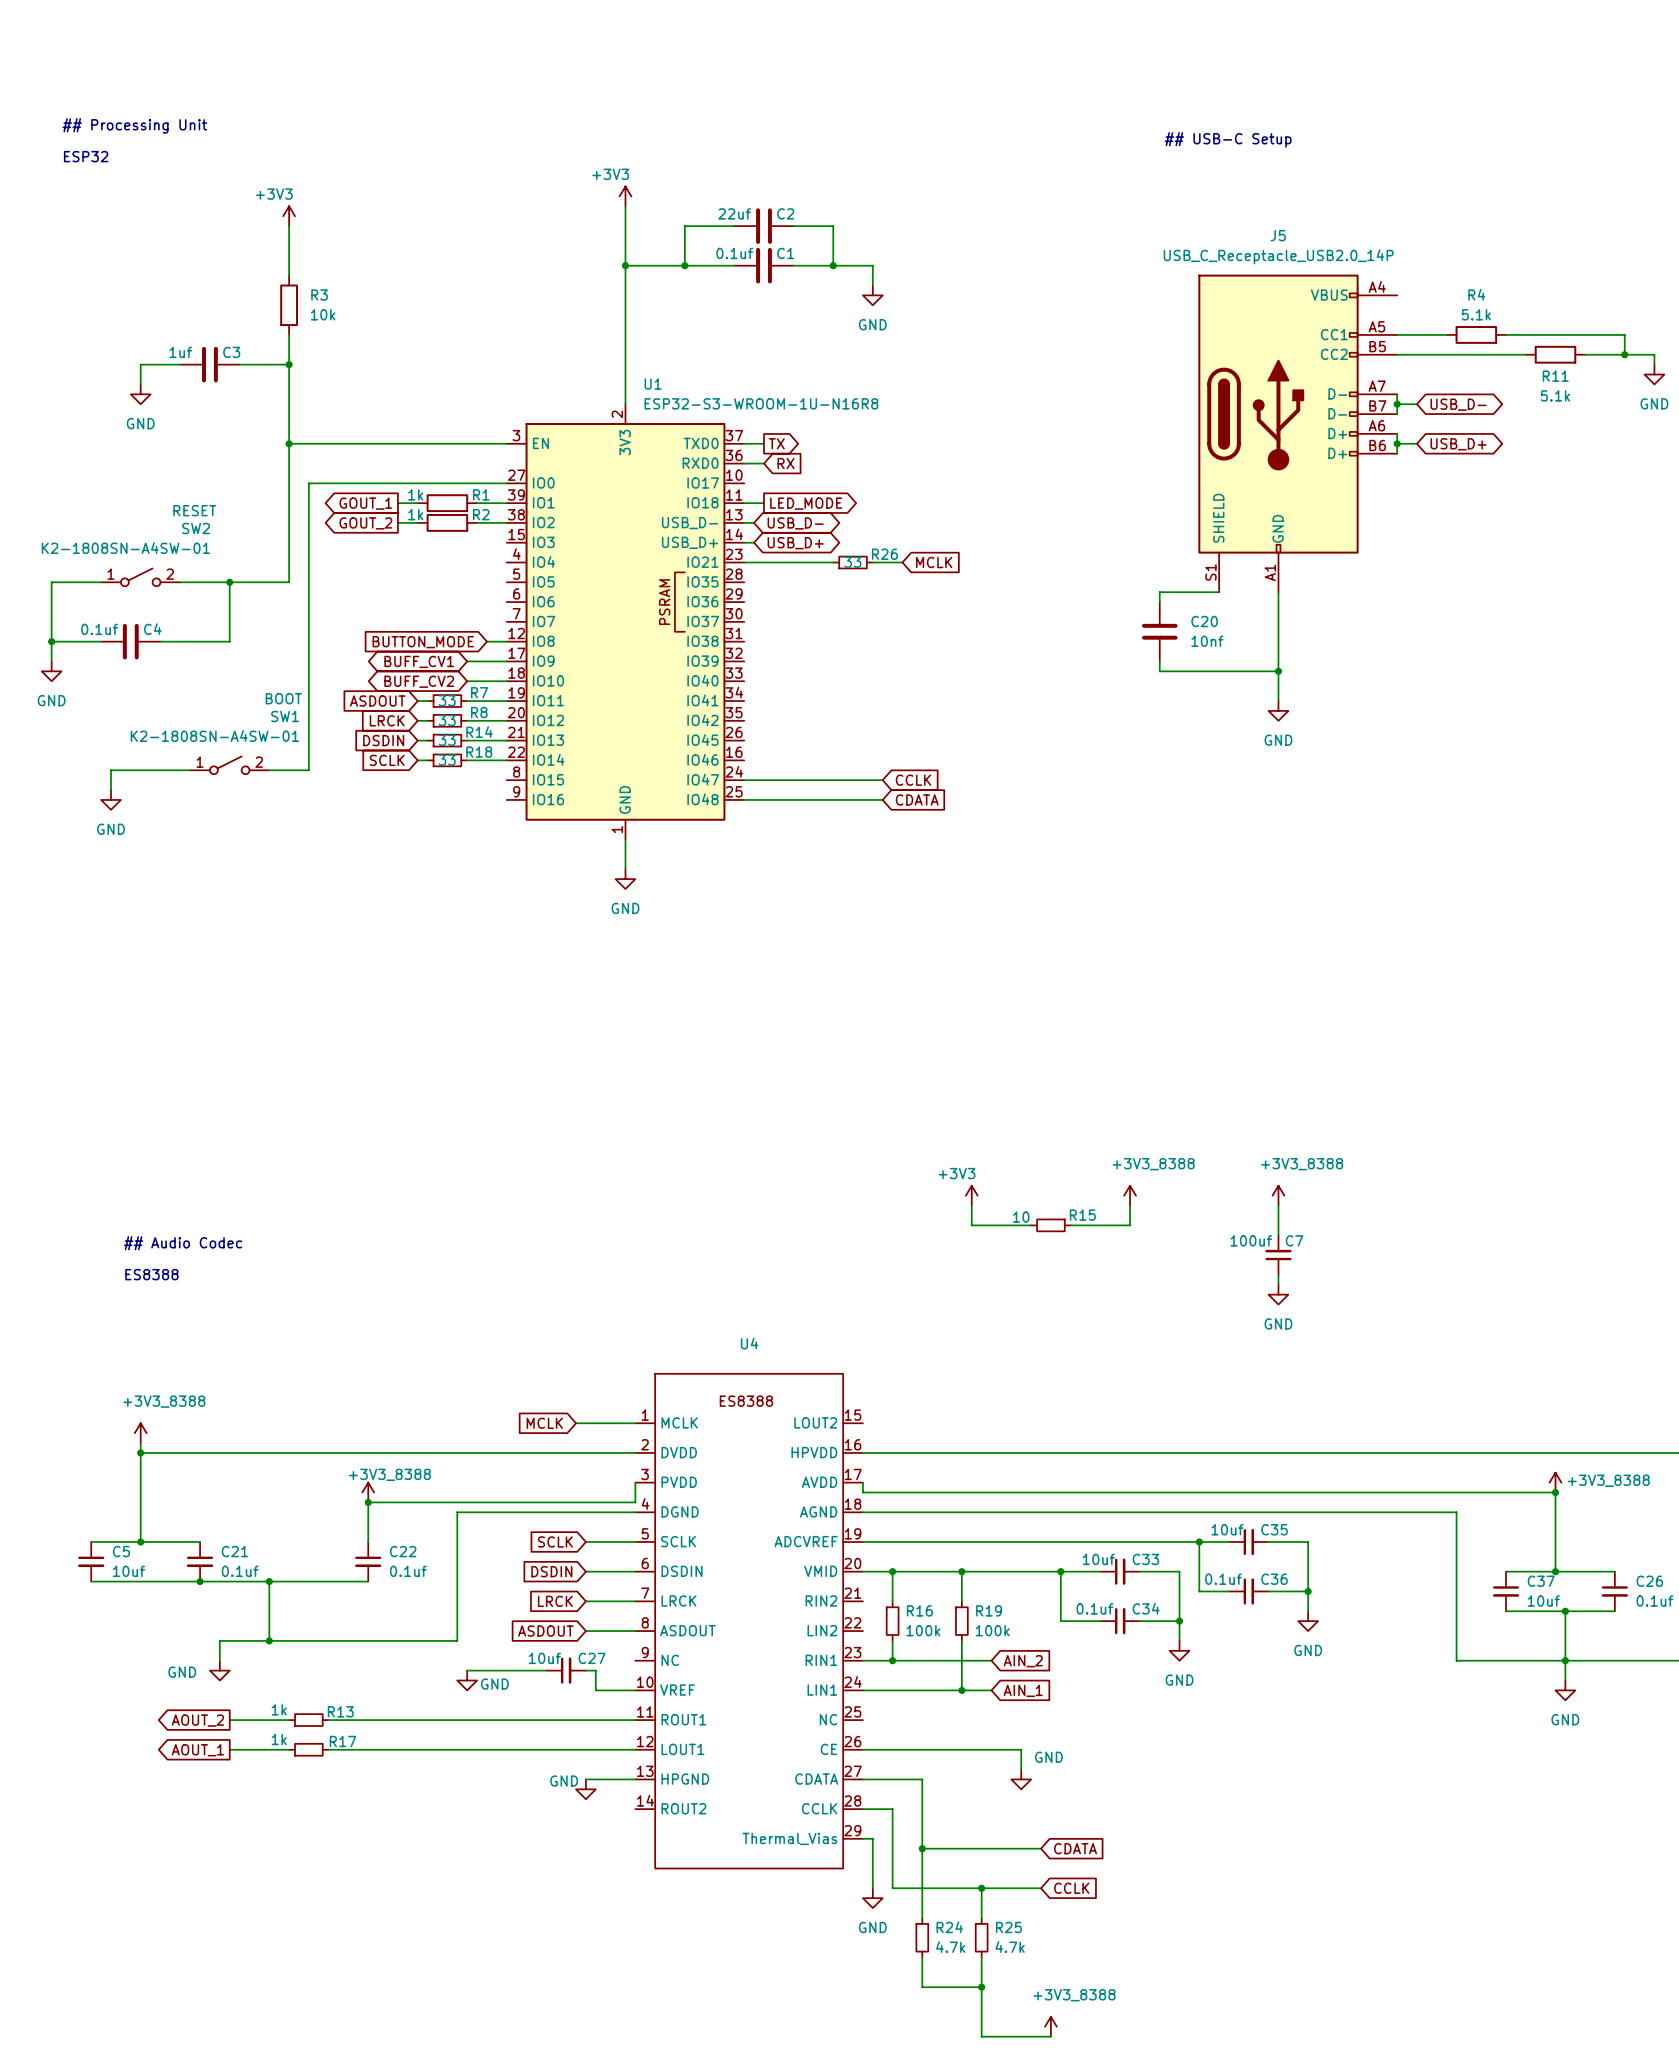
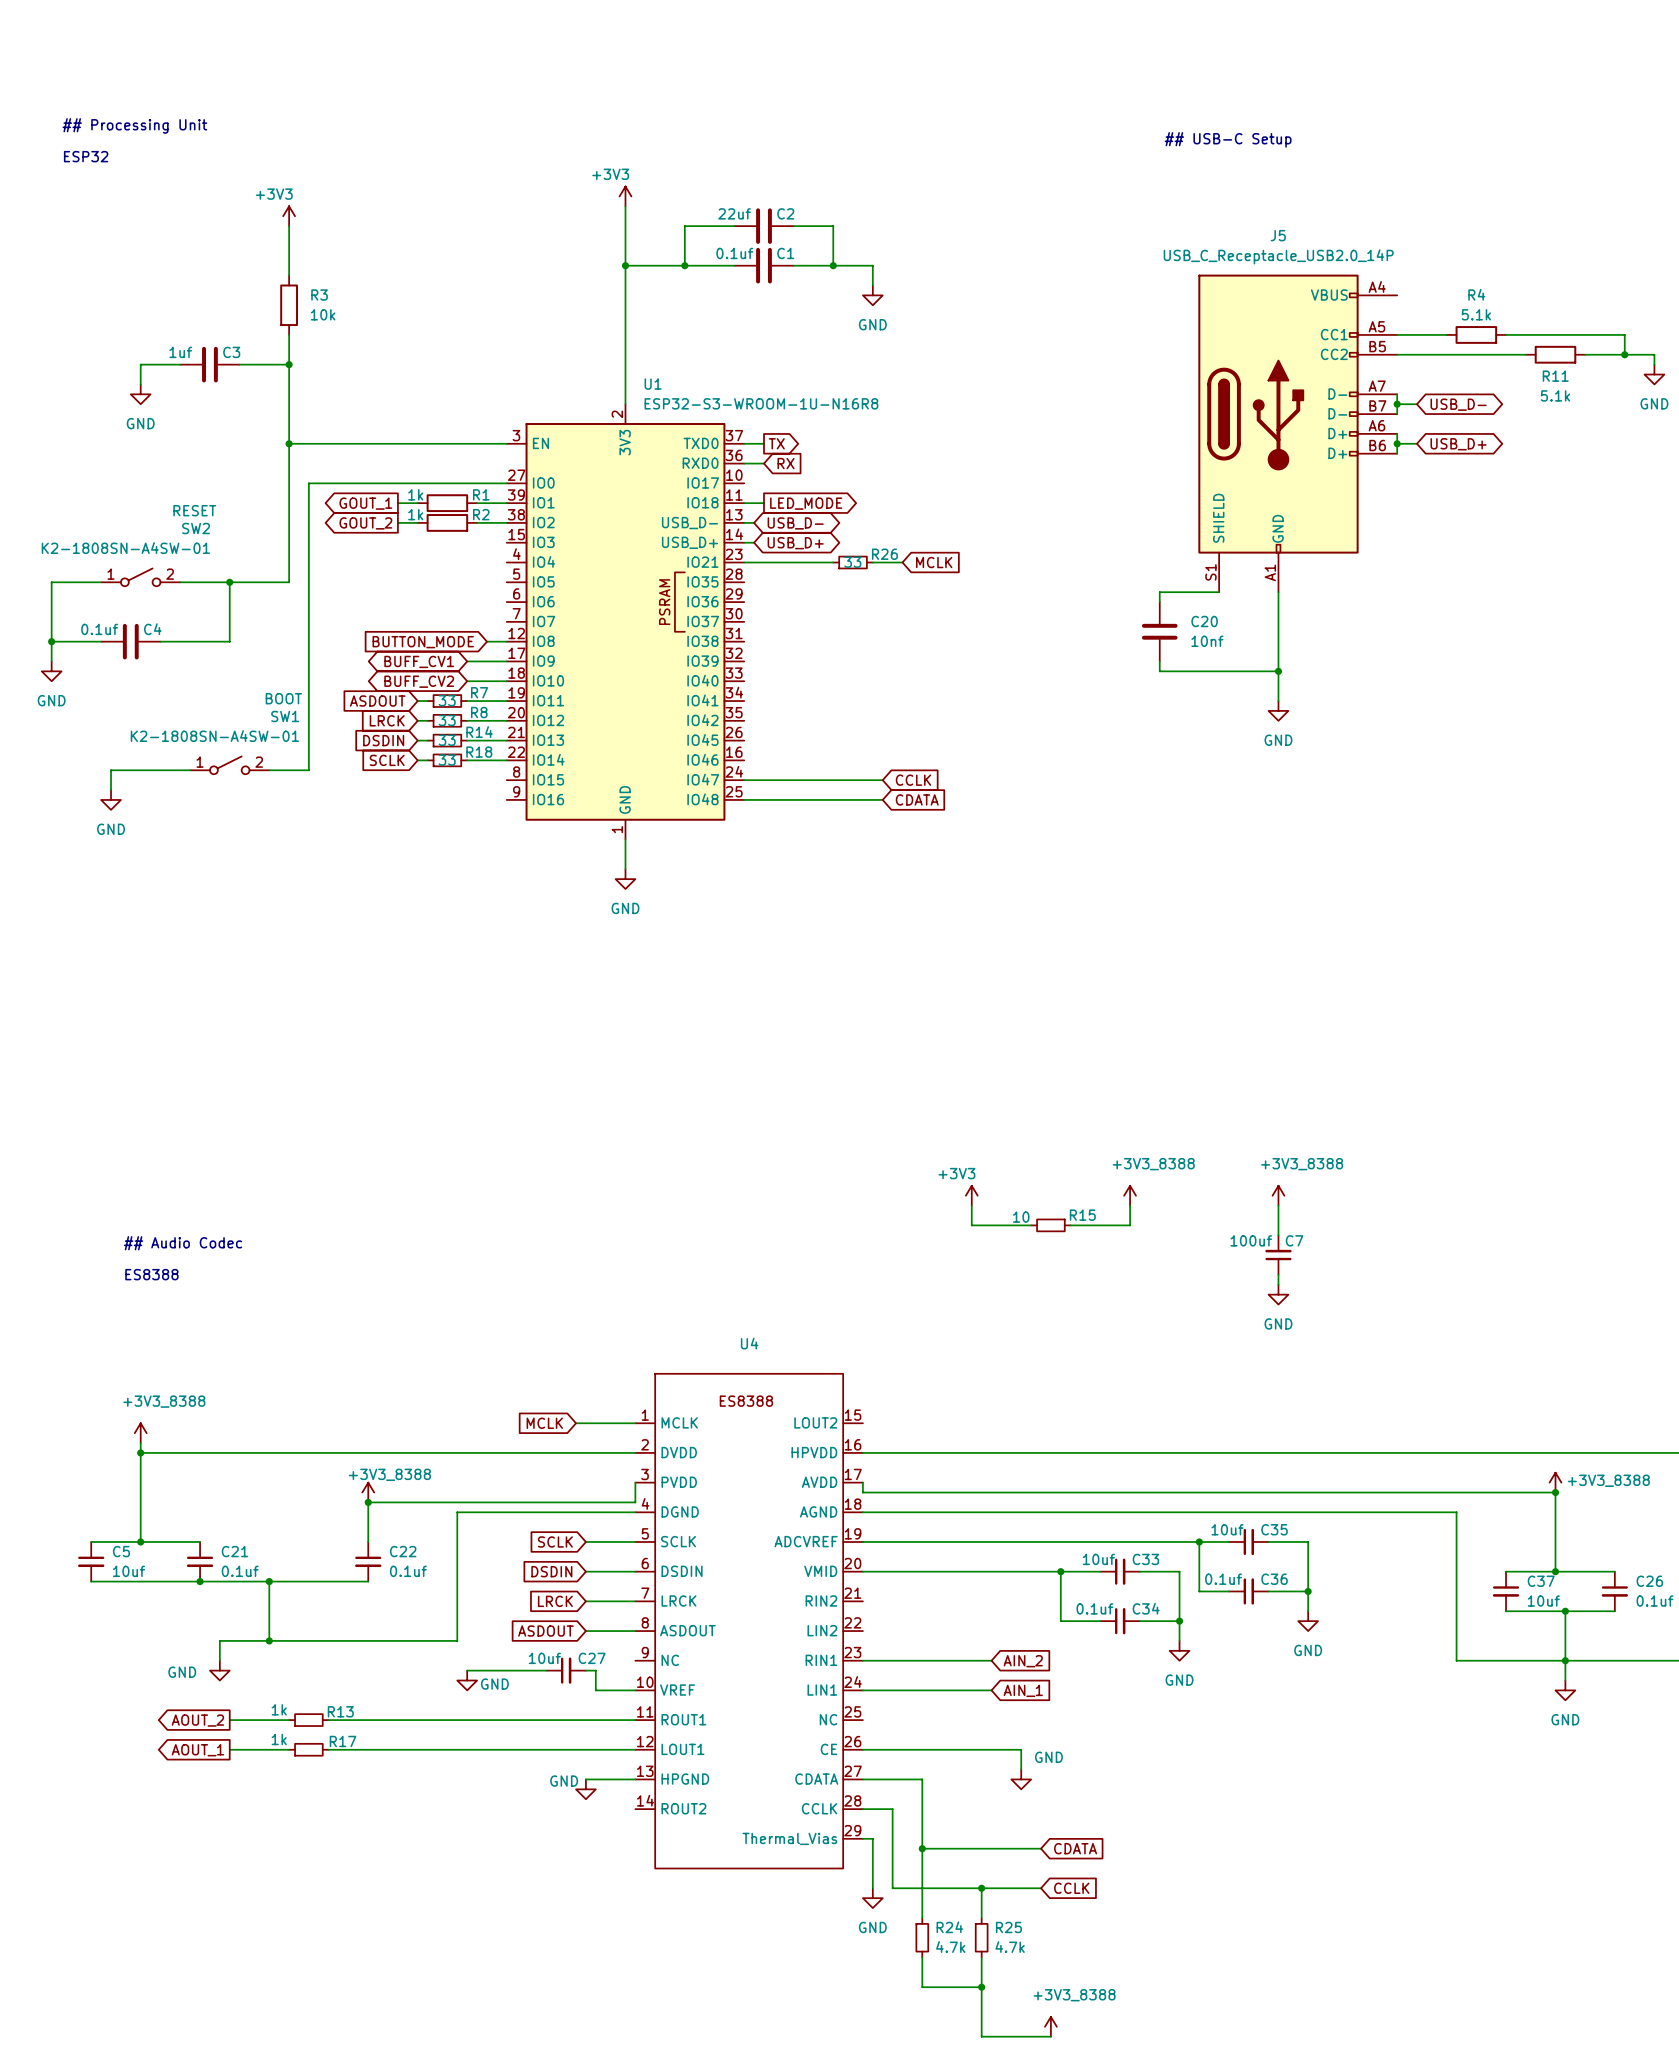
wire: (892, 1571) (892, 1601) -> none
junction: (892, 1571) -> none
wire: (961, 1571) (961, 1601) -> none
junction: (961, 1571) -> none
R16: 100k (892, 1621) -> none
R19: 100k (961, 1621) -> none
wire: (892, 1640) (892, 1660) -> none
wire: (961, 1640) (961, 1690) -> none
junction: (892, 1660) -> none
junction: (961, 1690) -> none

